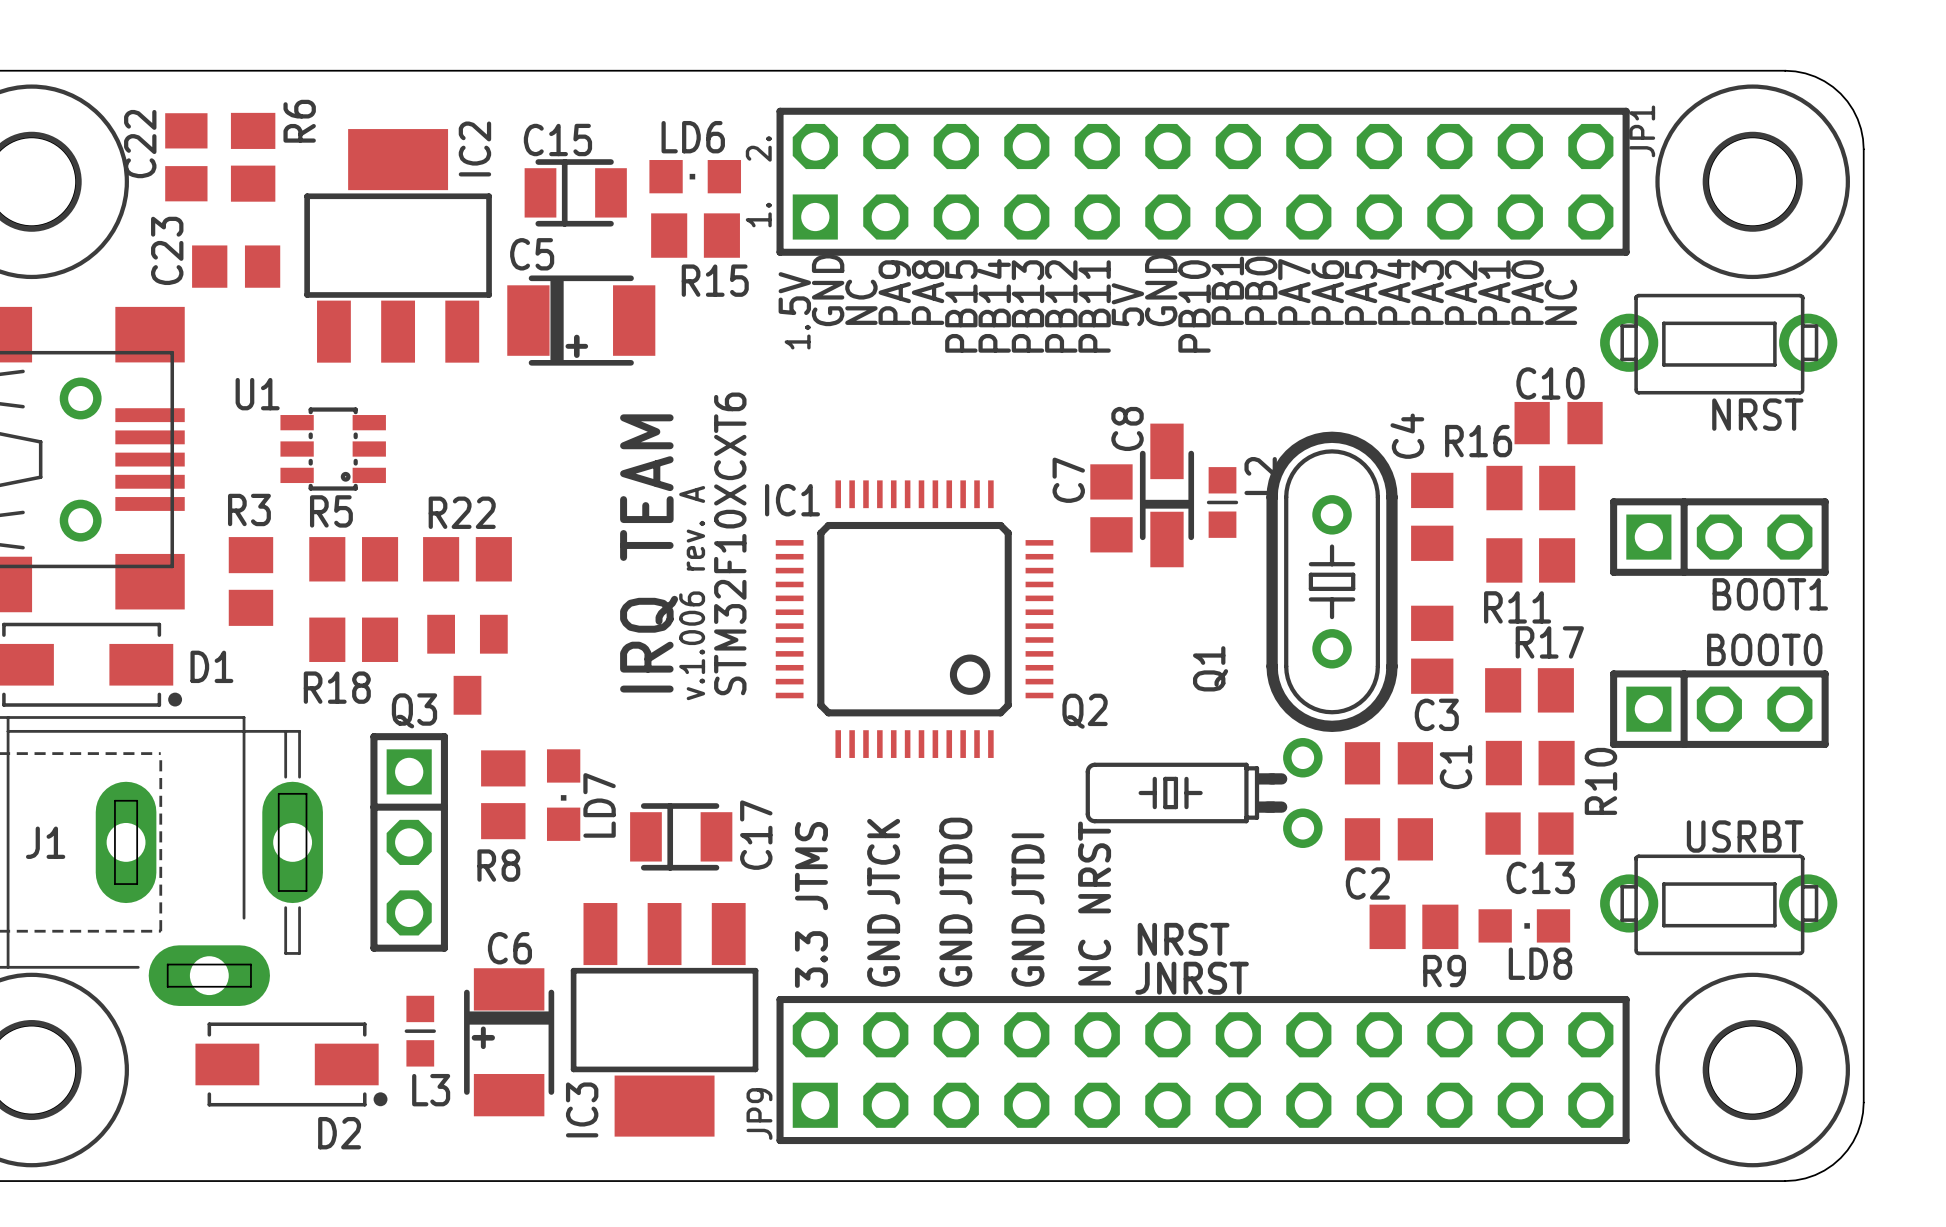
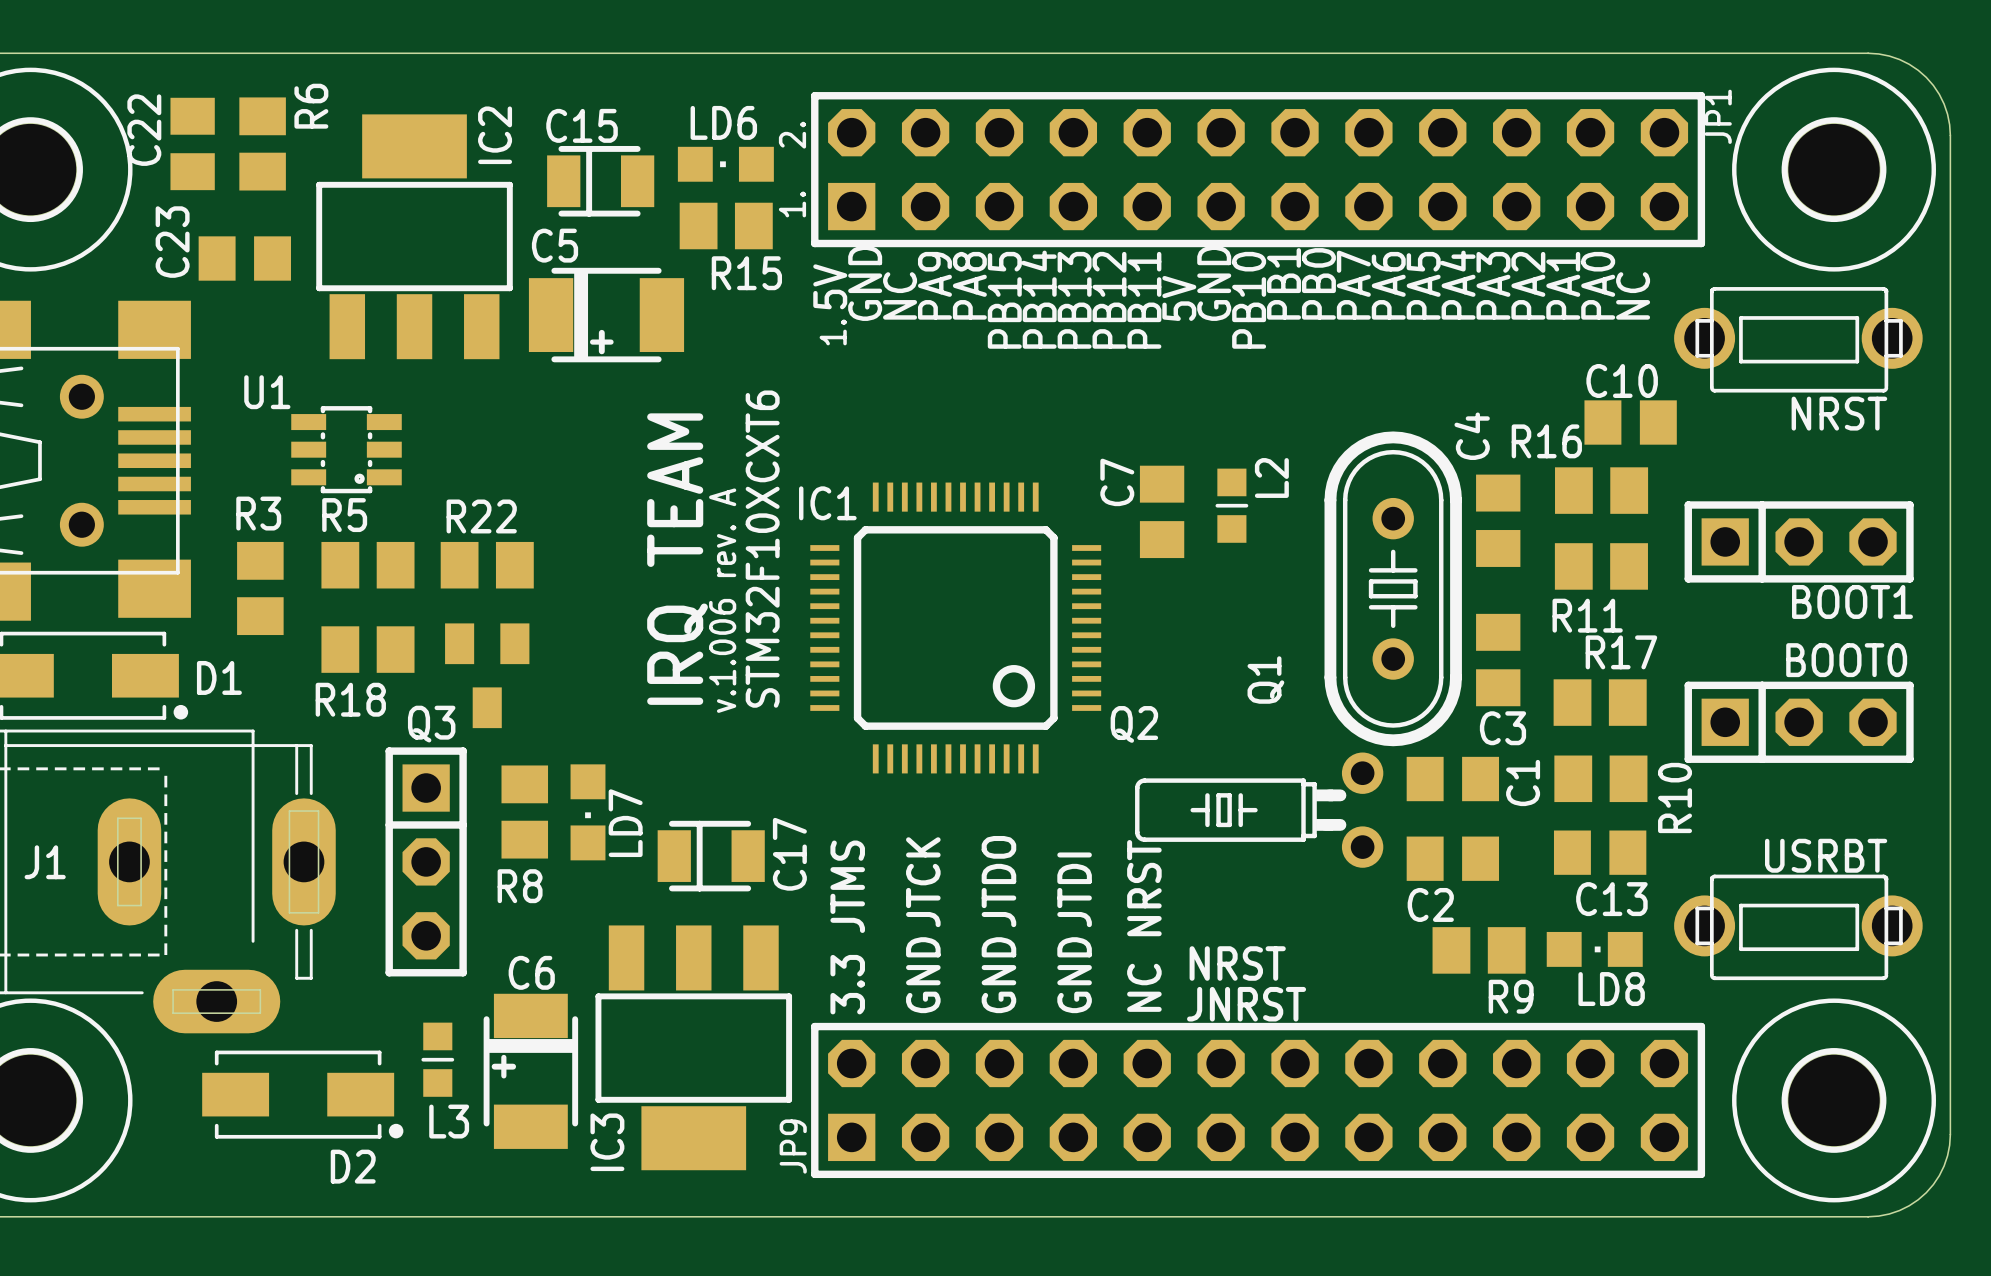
C8: (1166, 495) -> none
L2 position: (1222, 502) -> (1231, 505)

